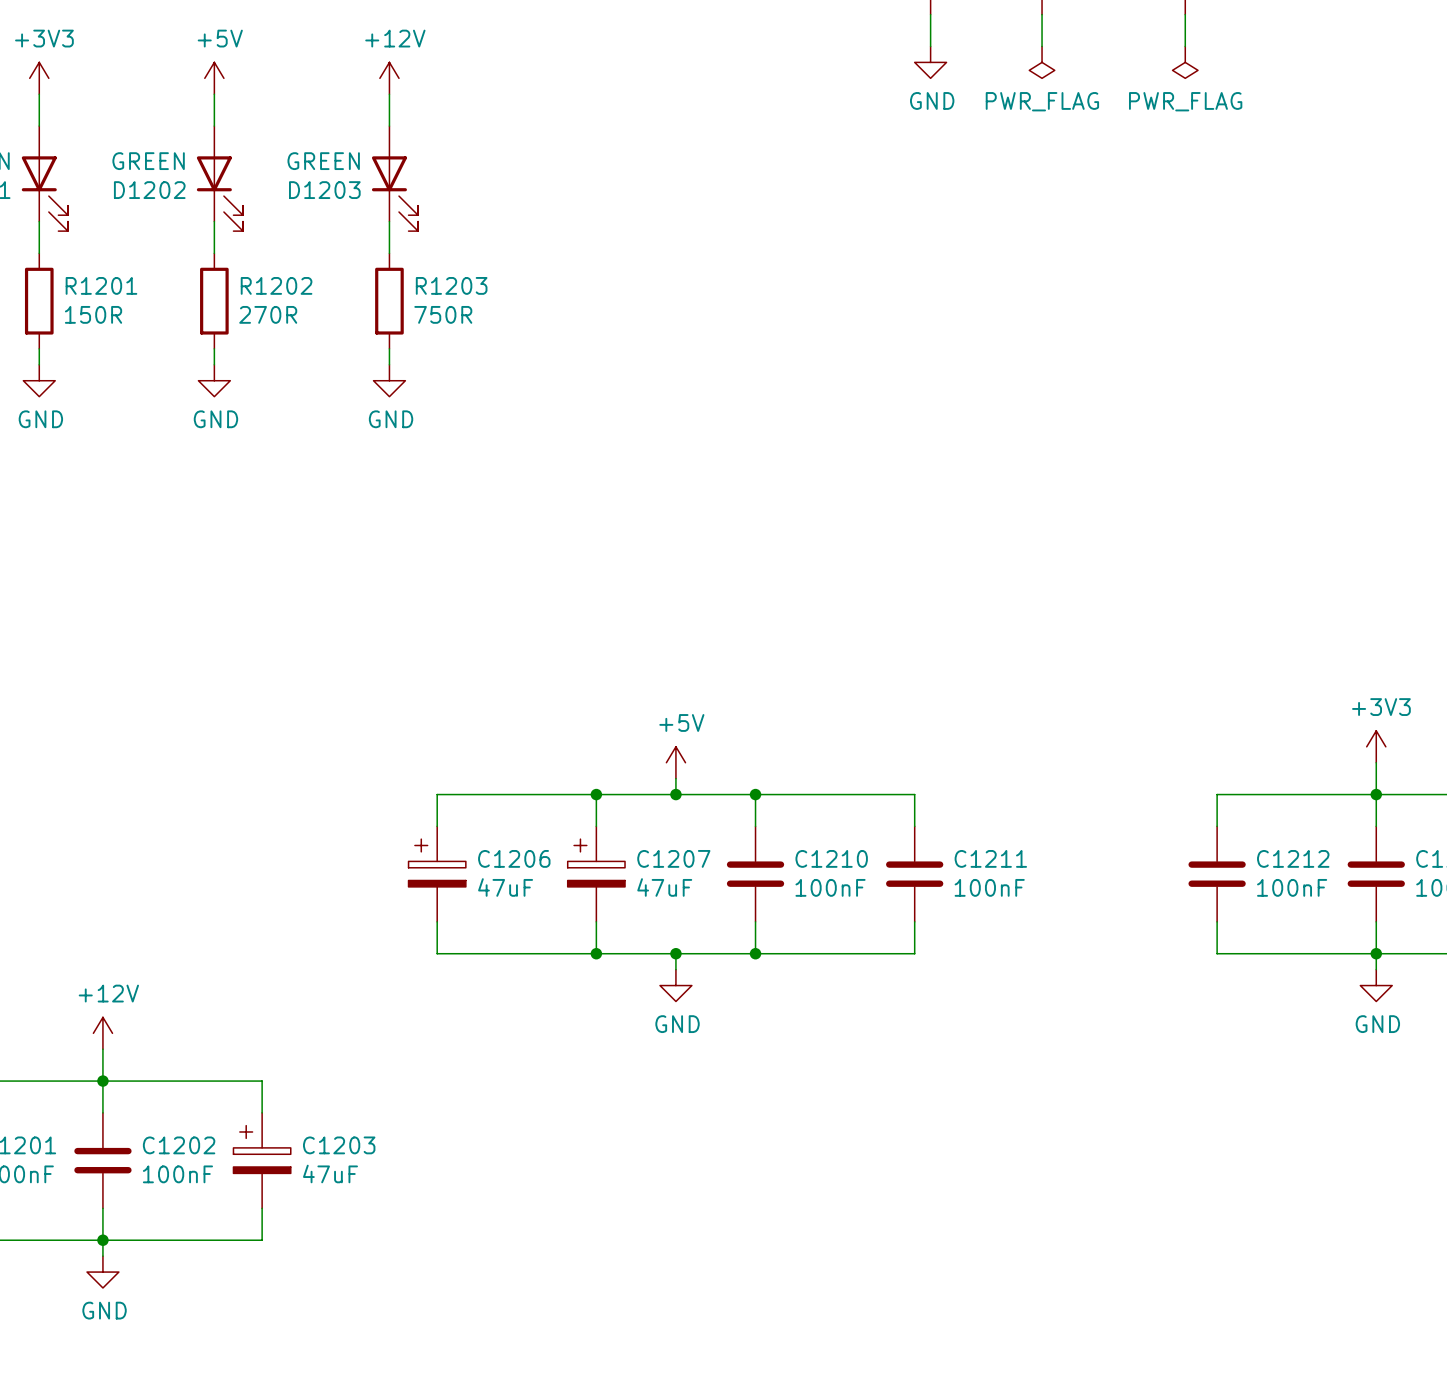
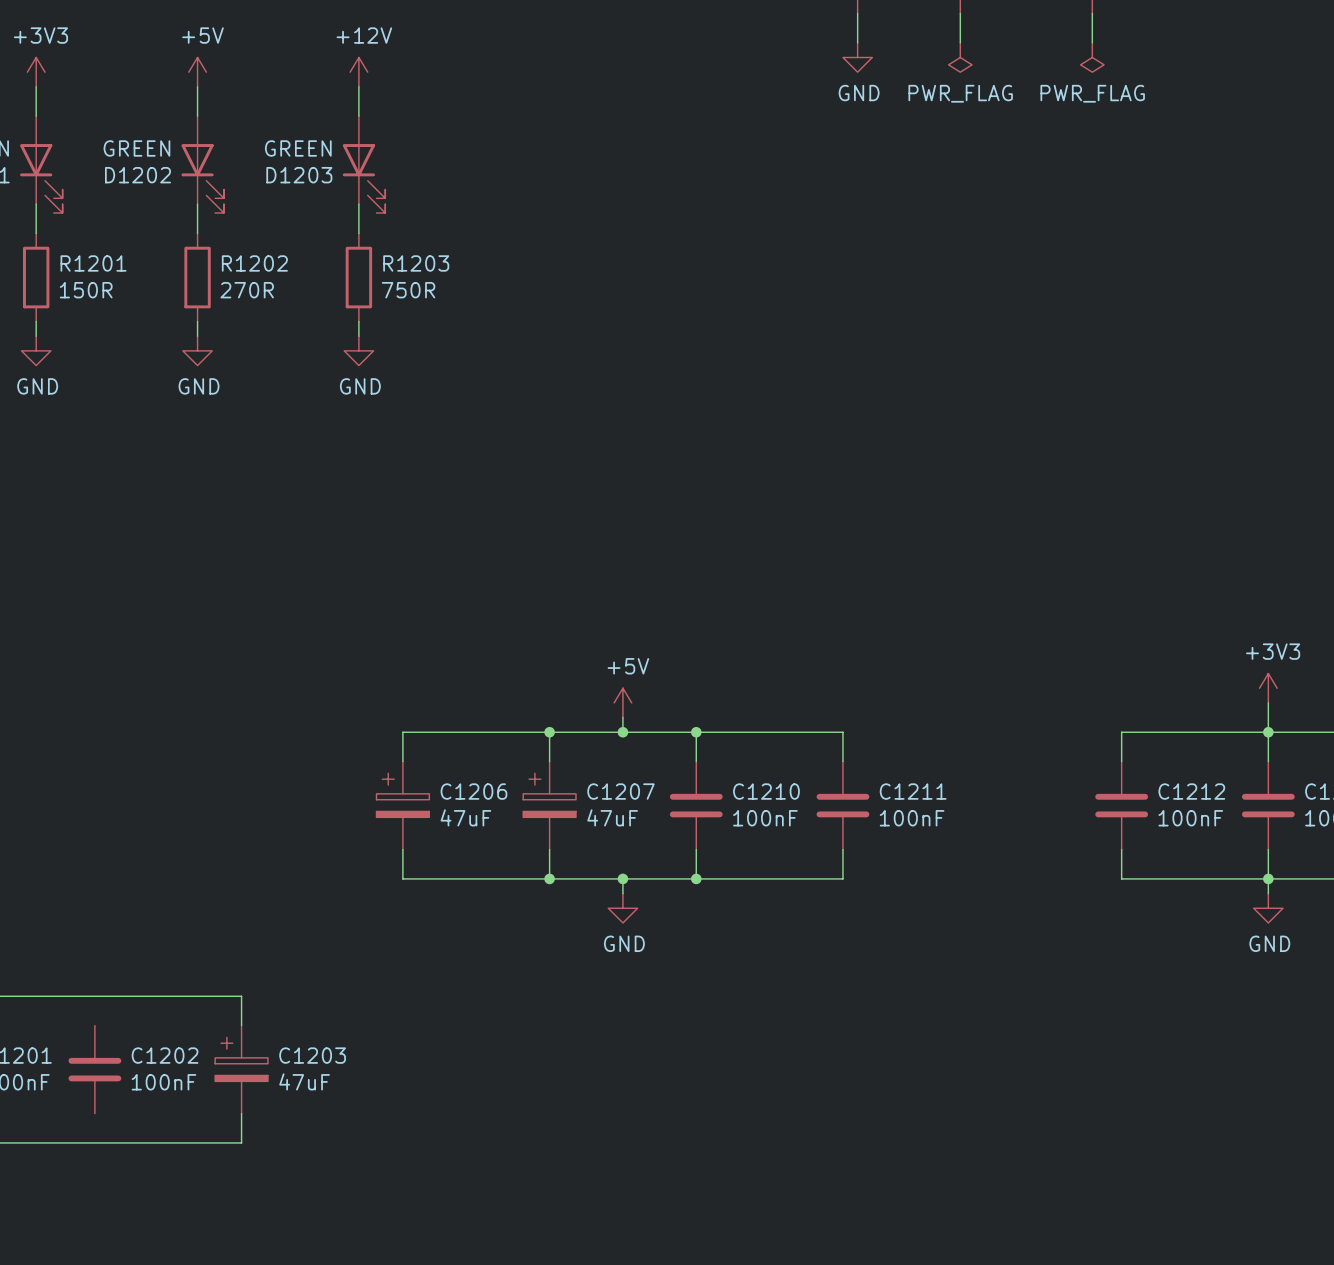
power symbol: +12V (102, 1033) -> none
wire: (102, 1049) (102, 1112) -> none
junction: (102, 1081) -> none
wire: (102, 1208) (102, 1256) -> none
junction: (102, 1240) -> none
power symbol: GND (102, 1272) -> none

